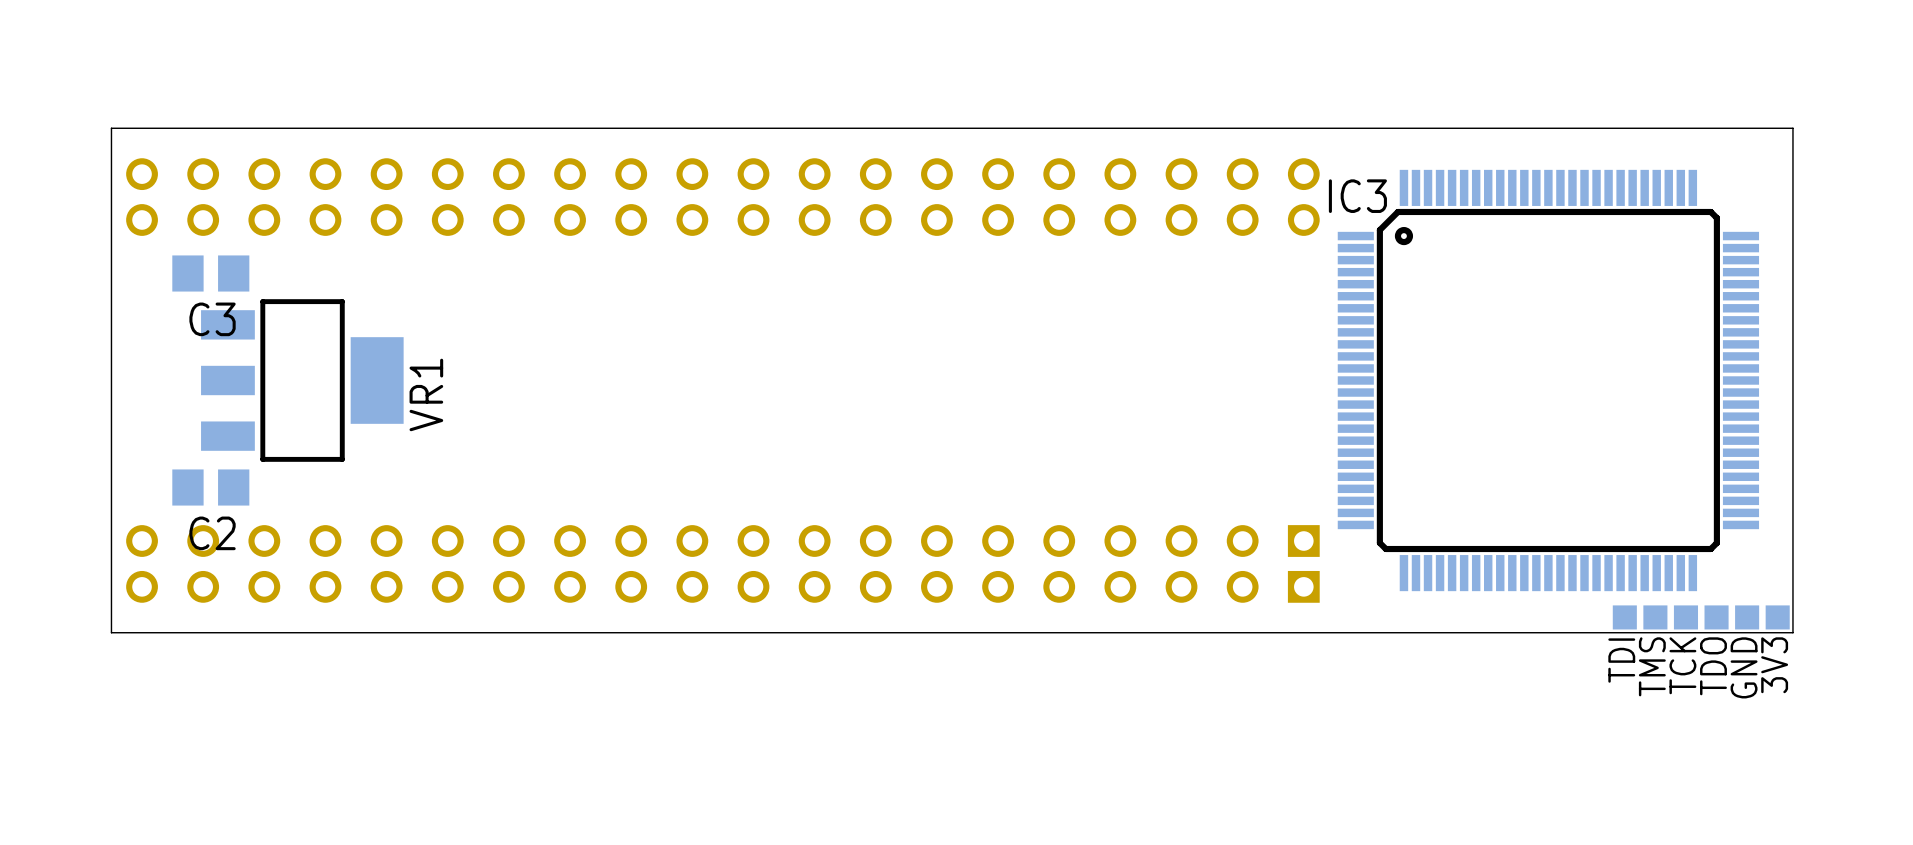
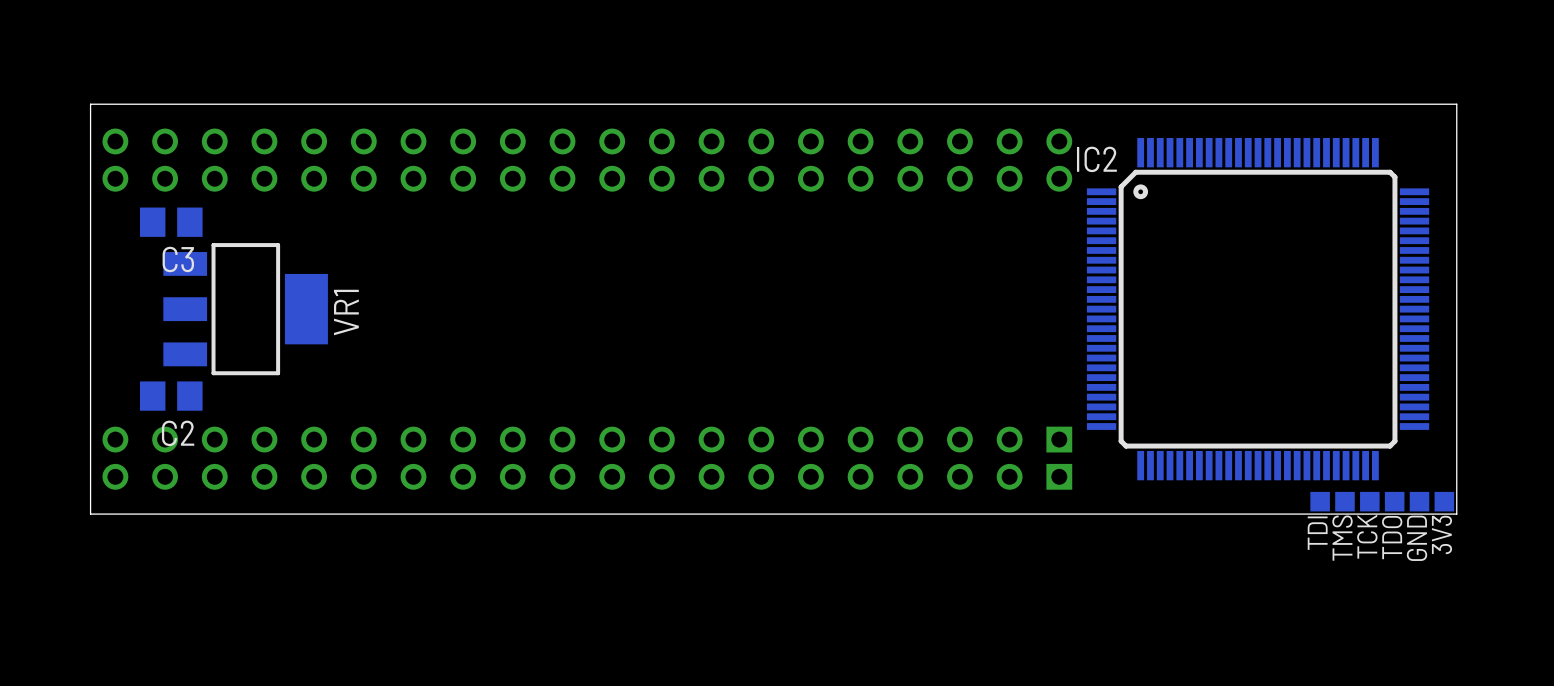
IC3 name: IC3 (1357, 196) -> IC2 (1096, 159)

